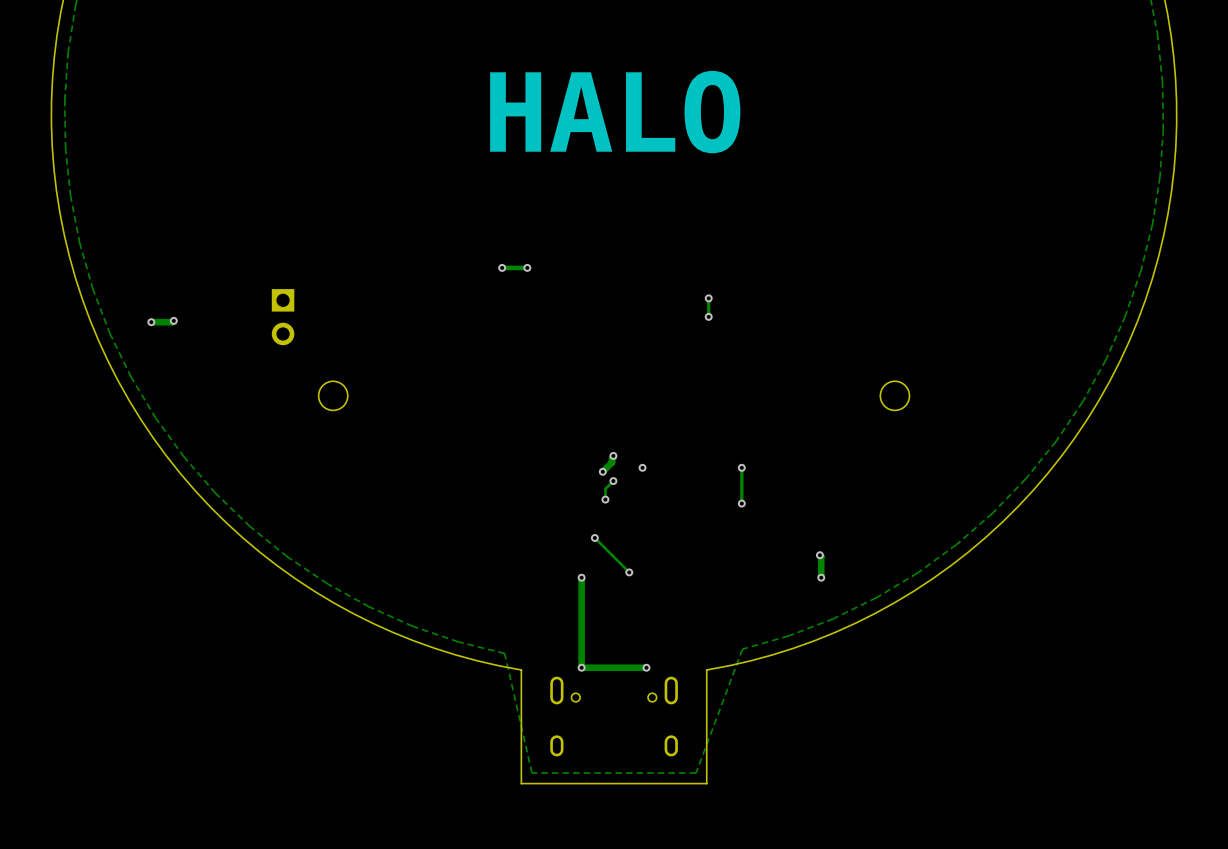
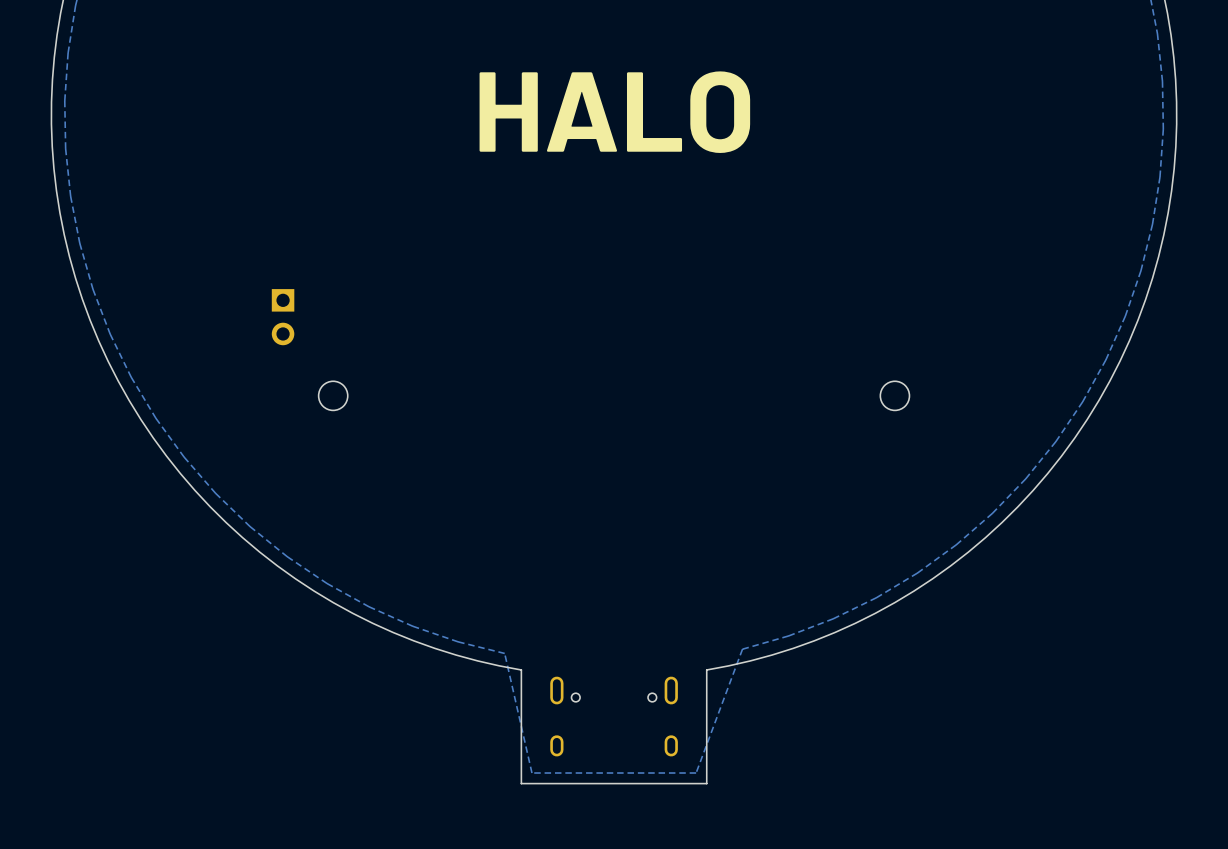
via: (502, 267) -> none
track: (527, 267) (502, 267) -> none
via: (527, 267) -> none
track: (708, 298) (708, 316) -> none
via: (708, 298) -> none
via: (708, 316) -> none
track: (173, 320) (151, 322) -> none
via: (173, 320) -> none
via: (151, 322) -> none
track: (613, 455) (612, 462) (602, 471) -> none
via: (613, 455) -> none
via: (642, 467) -> none
track: (741, 467) (741, 503) -> none
via: (741, 467) -> none
via: (602, 471) -> none
track: (613, 481) (605, 489) (605, 499) -> none
via: (613, 481) -> none
via: (605, 499) -> none
via: (741, 503) -> none
track: (594, 537) (629, 572) -> none
via: (594, 537) -> none
track: (819, 555) (821, 577) -> none
via: (819, 555) -> none
via: (629, 572) -> none
track: (581, 577) (581, 665) -> none
via: (581, 577) -> none
via: (821, 577) -> none
via: (581, 667) -> none
track: (646, 667) (581, 667) -> none
via: (646, 667) -> none

